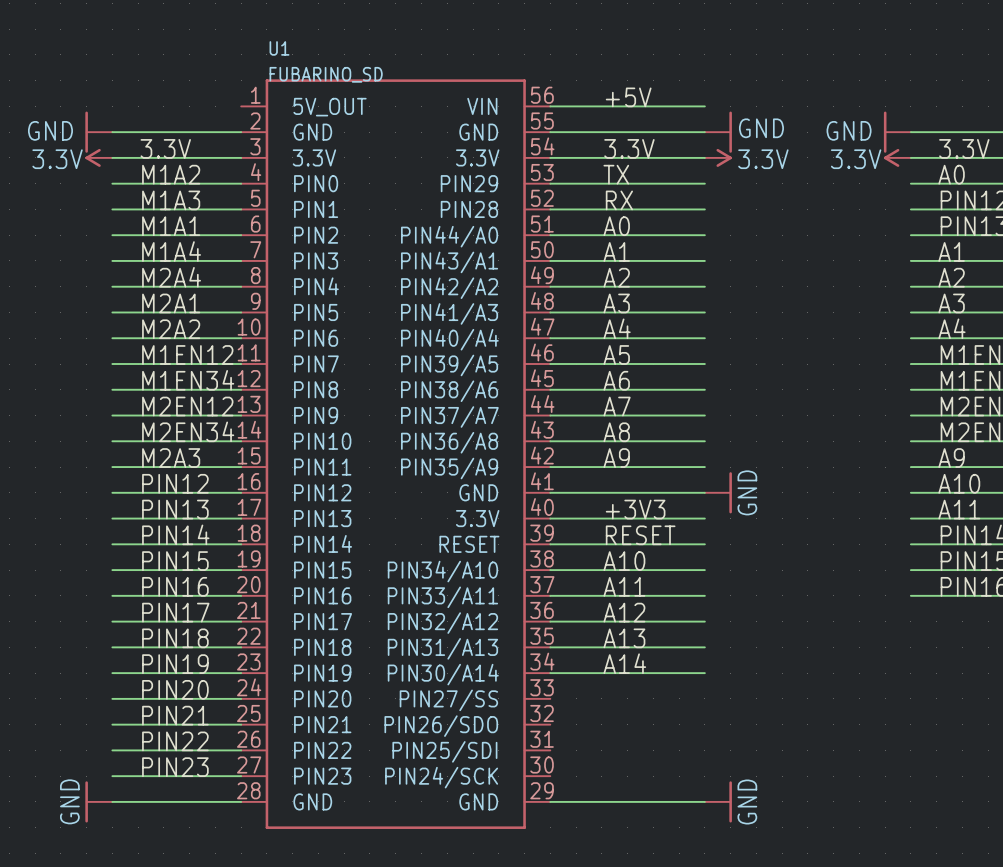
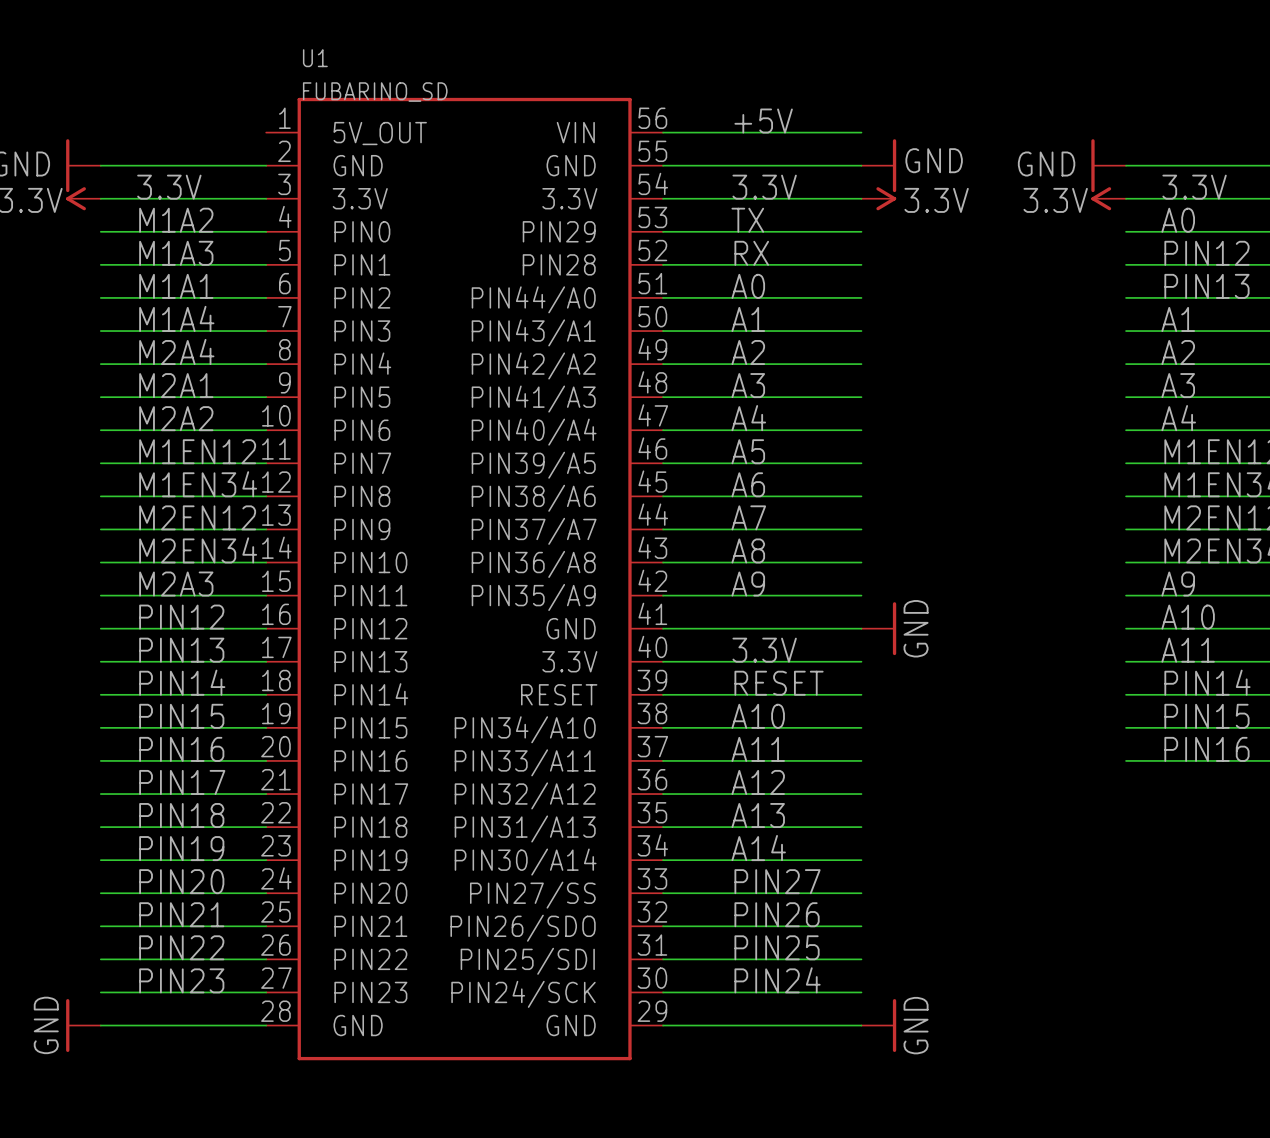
label: +3V3 (635, 509) -> 3.3V (764, 650)
label: none -> PIN27 (777, 881)
wire: none -> (663, 893) (861, 893)
label: none -> PIN26 (777, 914)
wire: none -> (663, 926) (861, 926)
label: none -> PIN25 (777, 947)
wire: none -> (663, 959) (861, 959)
label: none -> PIN24 (777, 980)
wire: none -> (663, 992) (861, 992)

